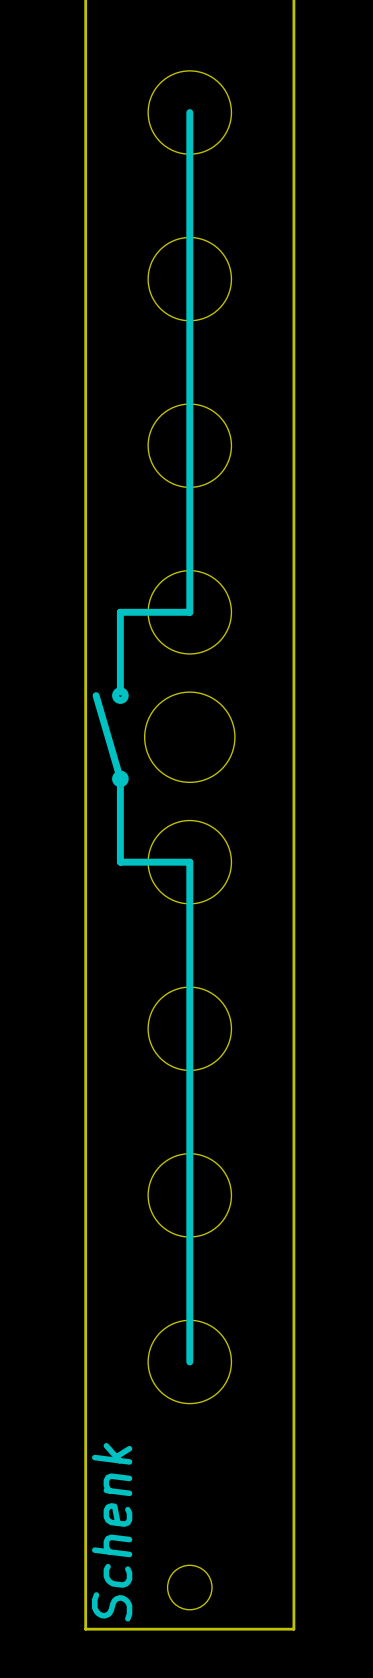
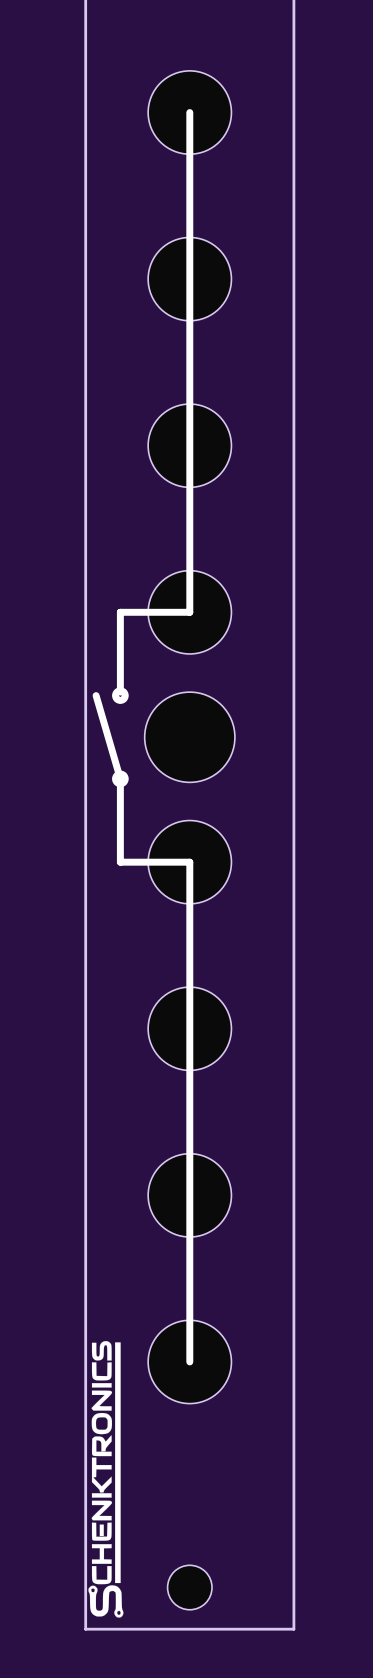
drawing: none -> [88, 1341, 124, 1618]
text: Schenk (112, 1532) -> none

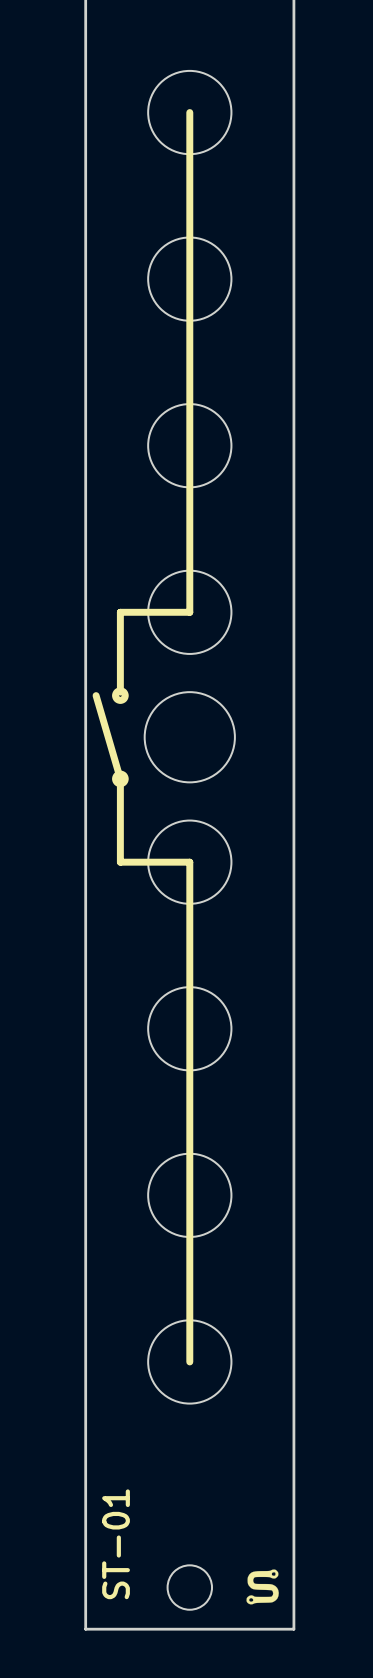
drawing: [88, 1341, 124, 1618] -> none
text: none -> ST-01 (116, 1544)
drawing: none -> [246, 1569, 279, 1605]

